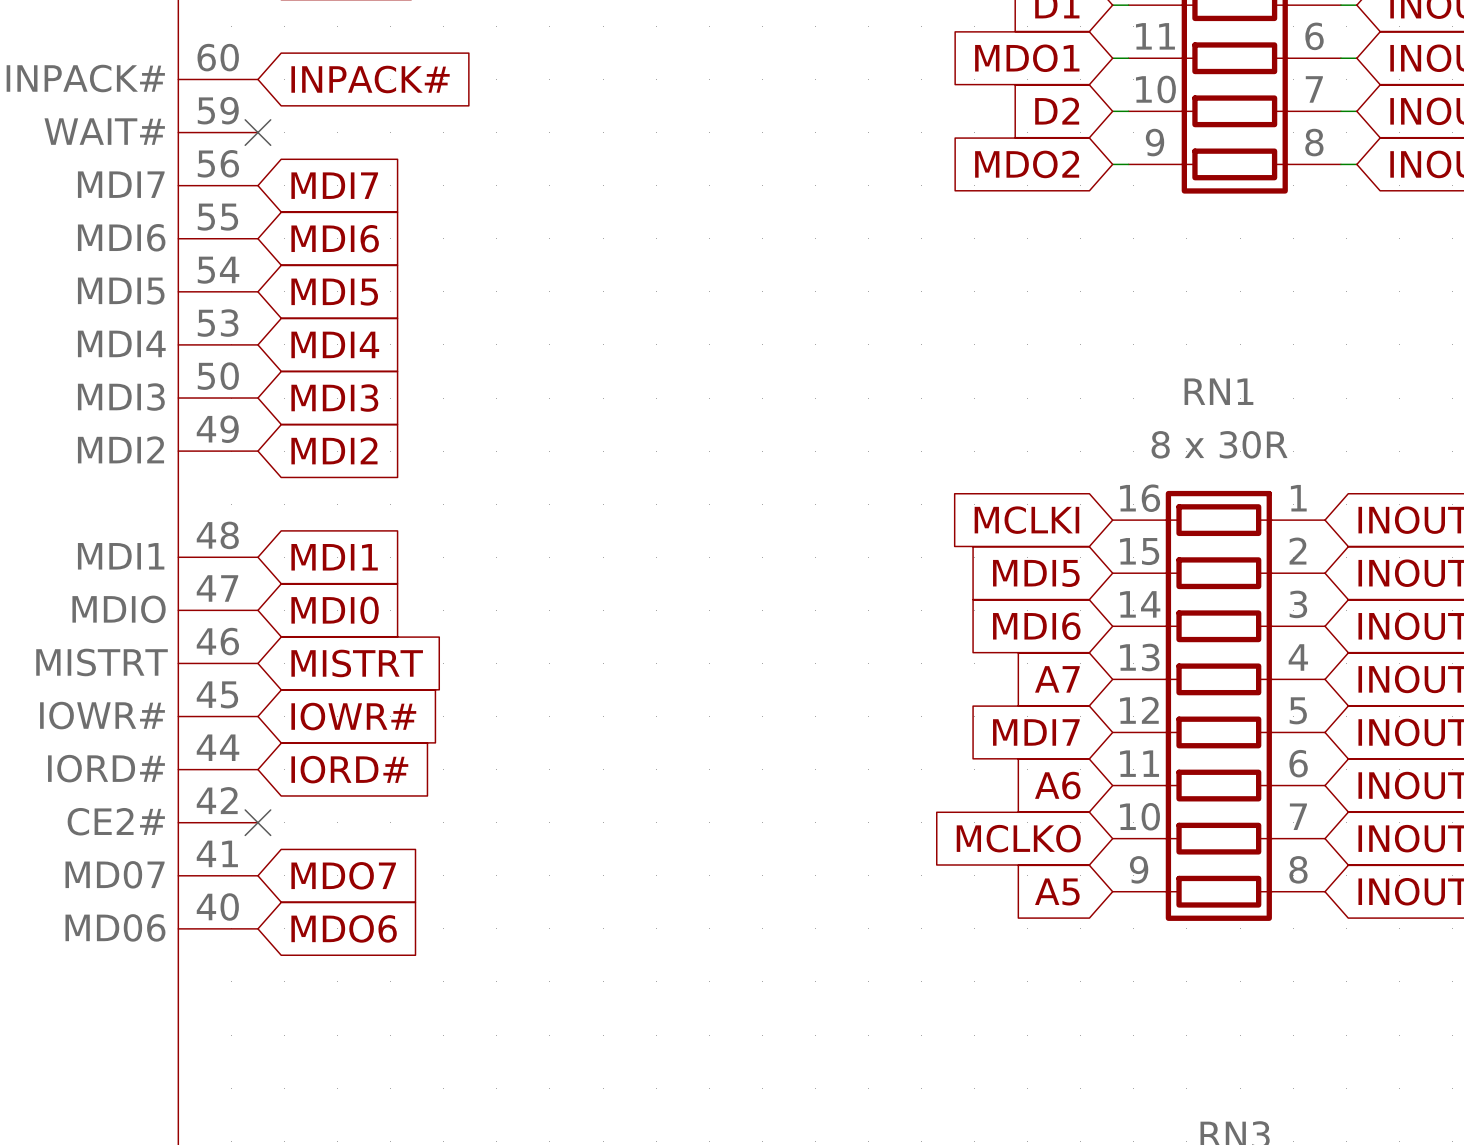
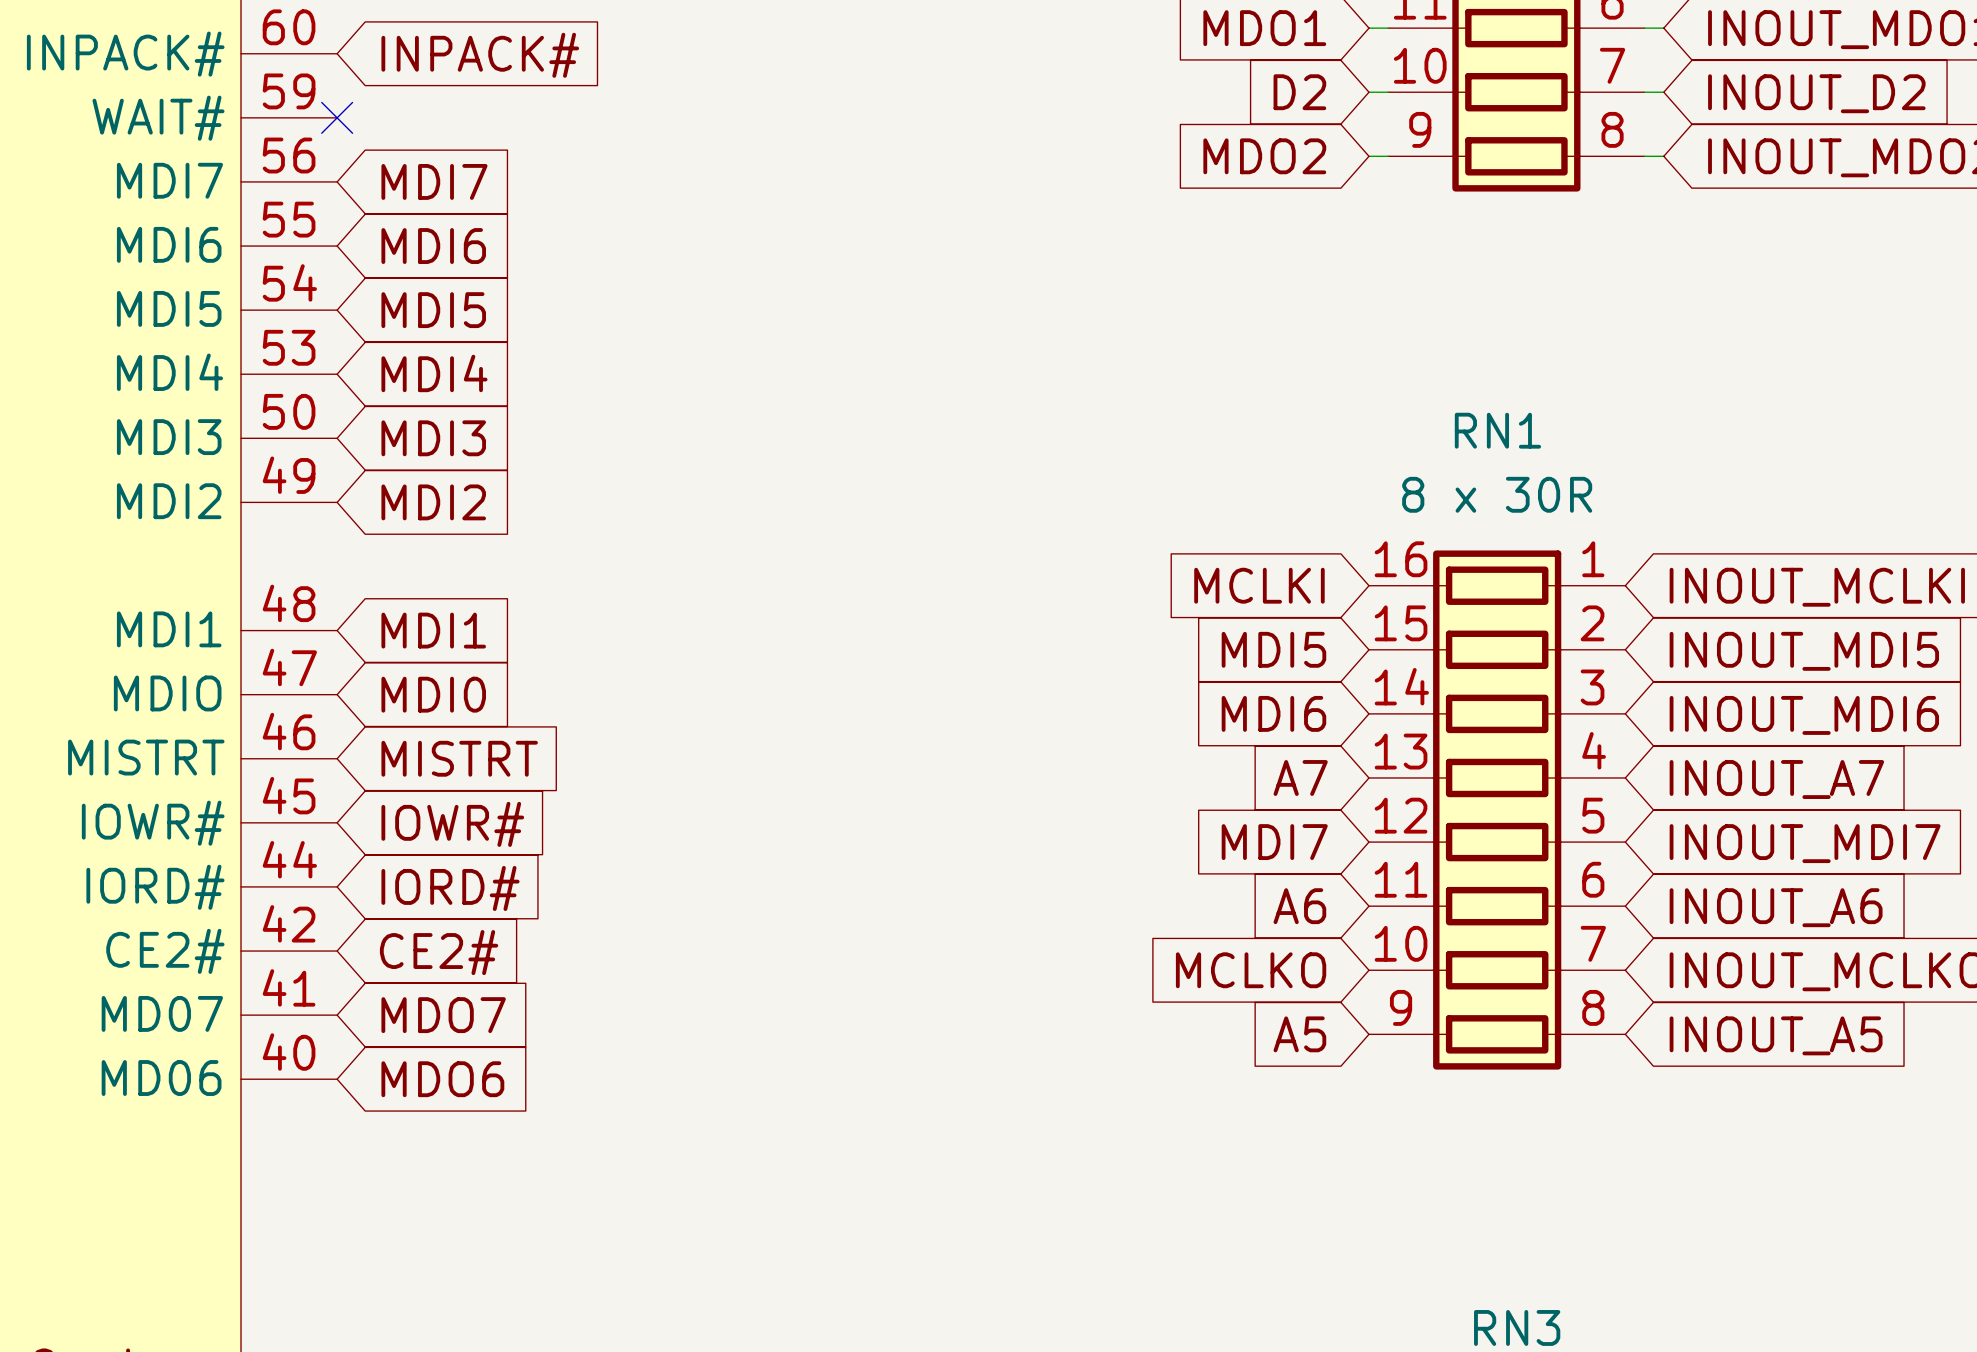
no-connect mark: (257, 822) -> none
global label: none -> CE2# (439, 952)

